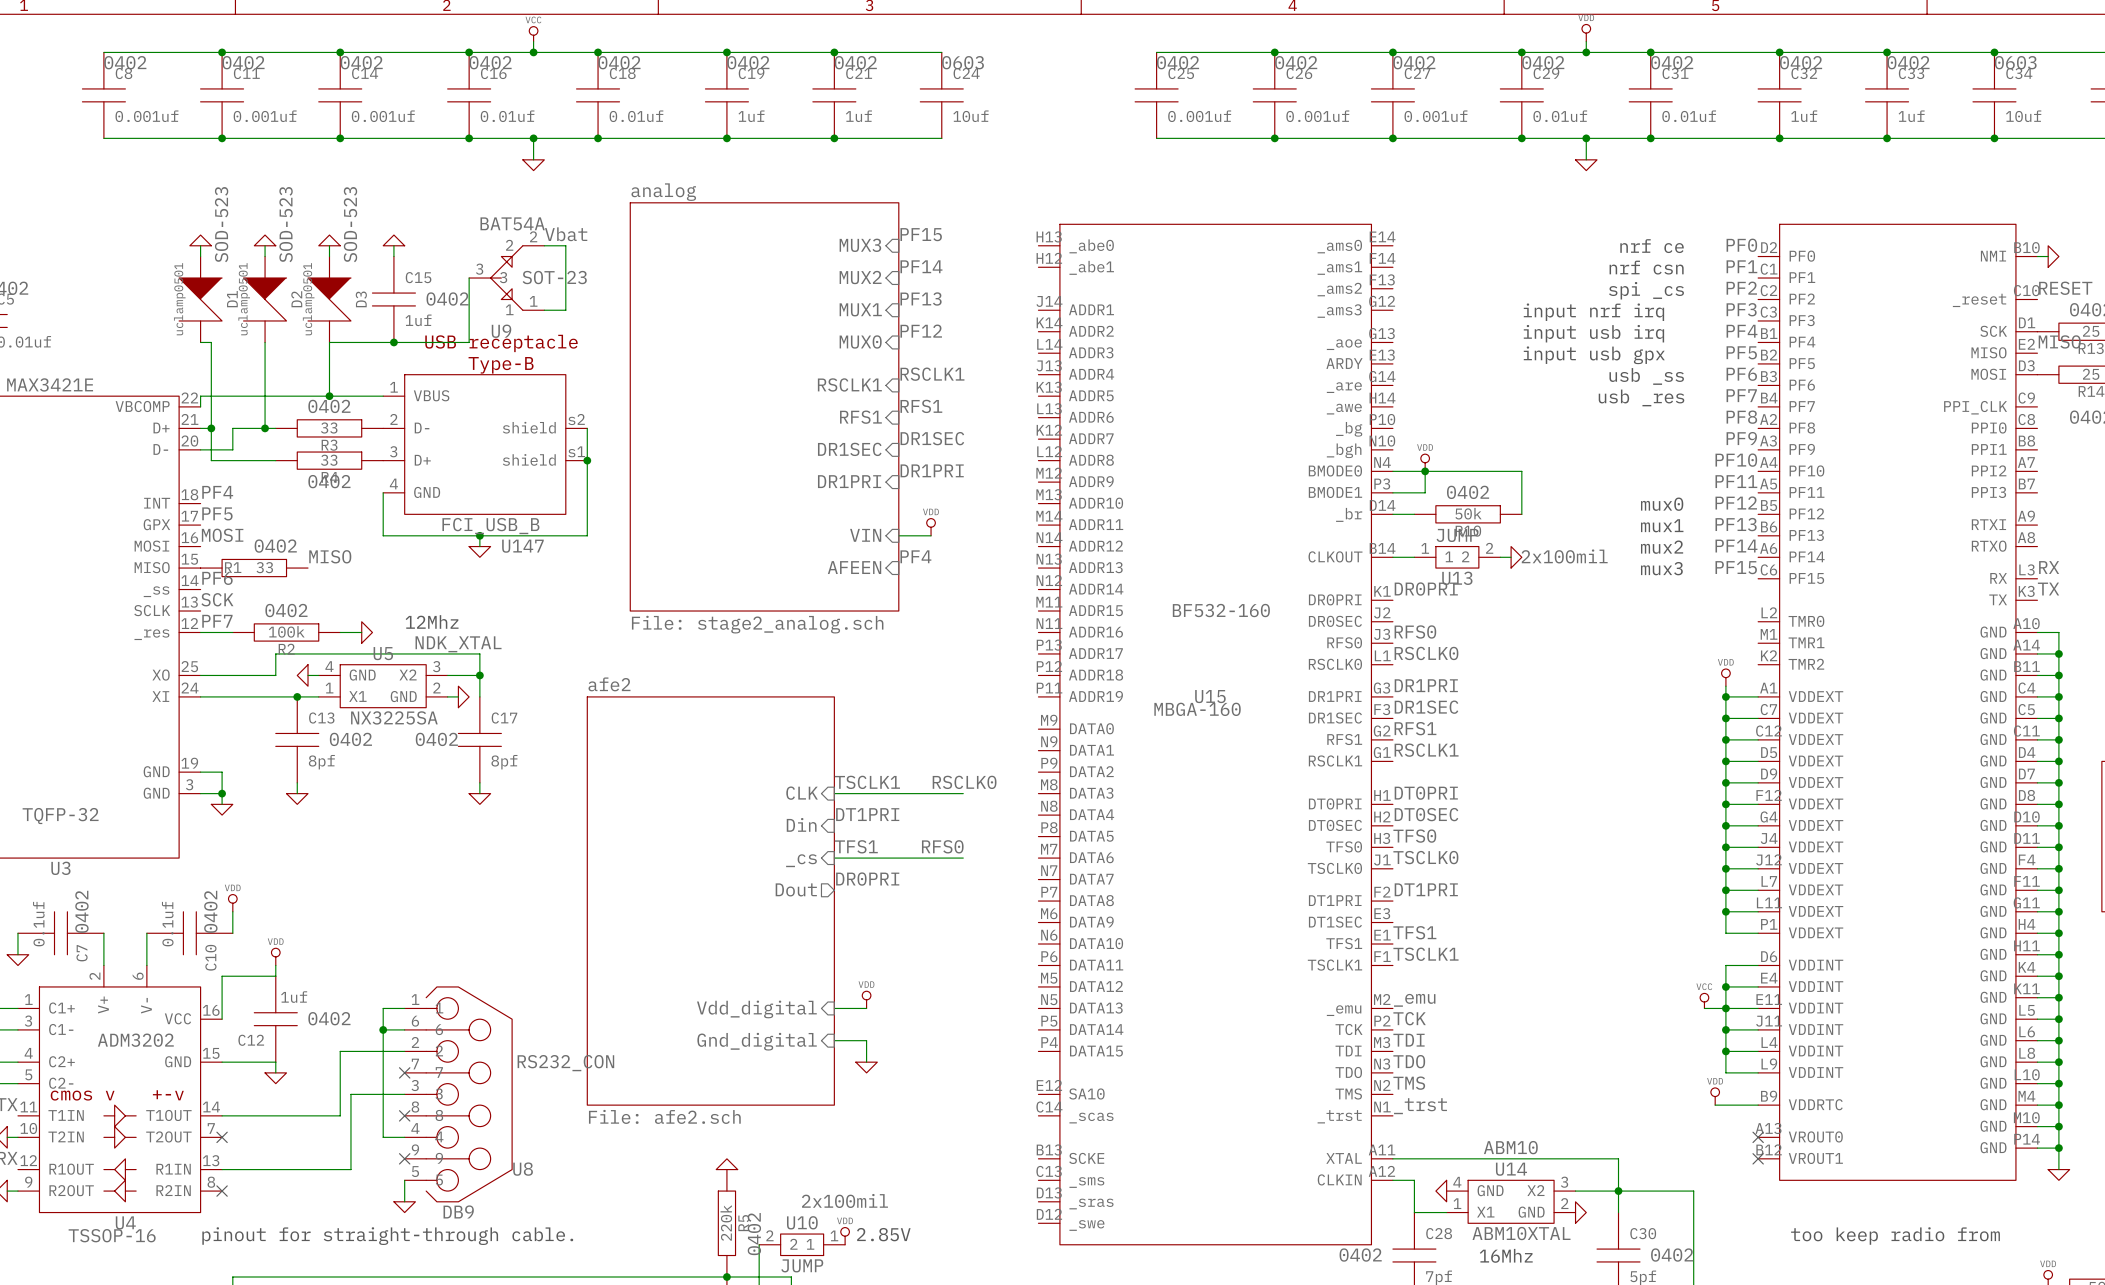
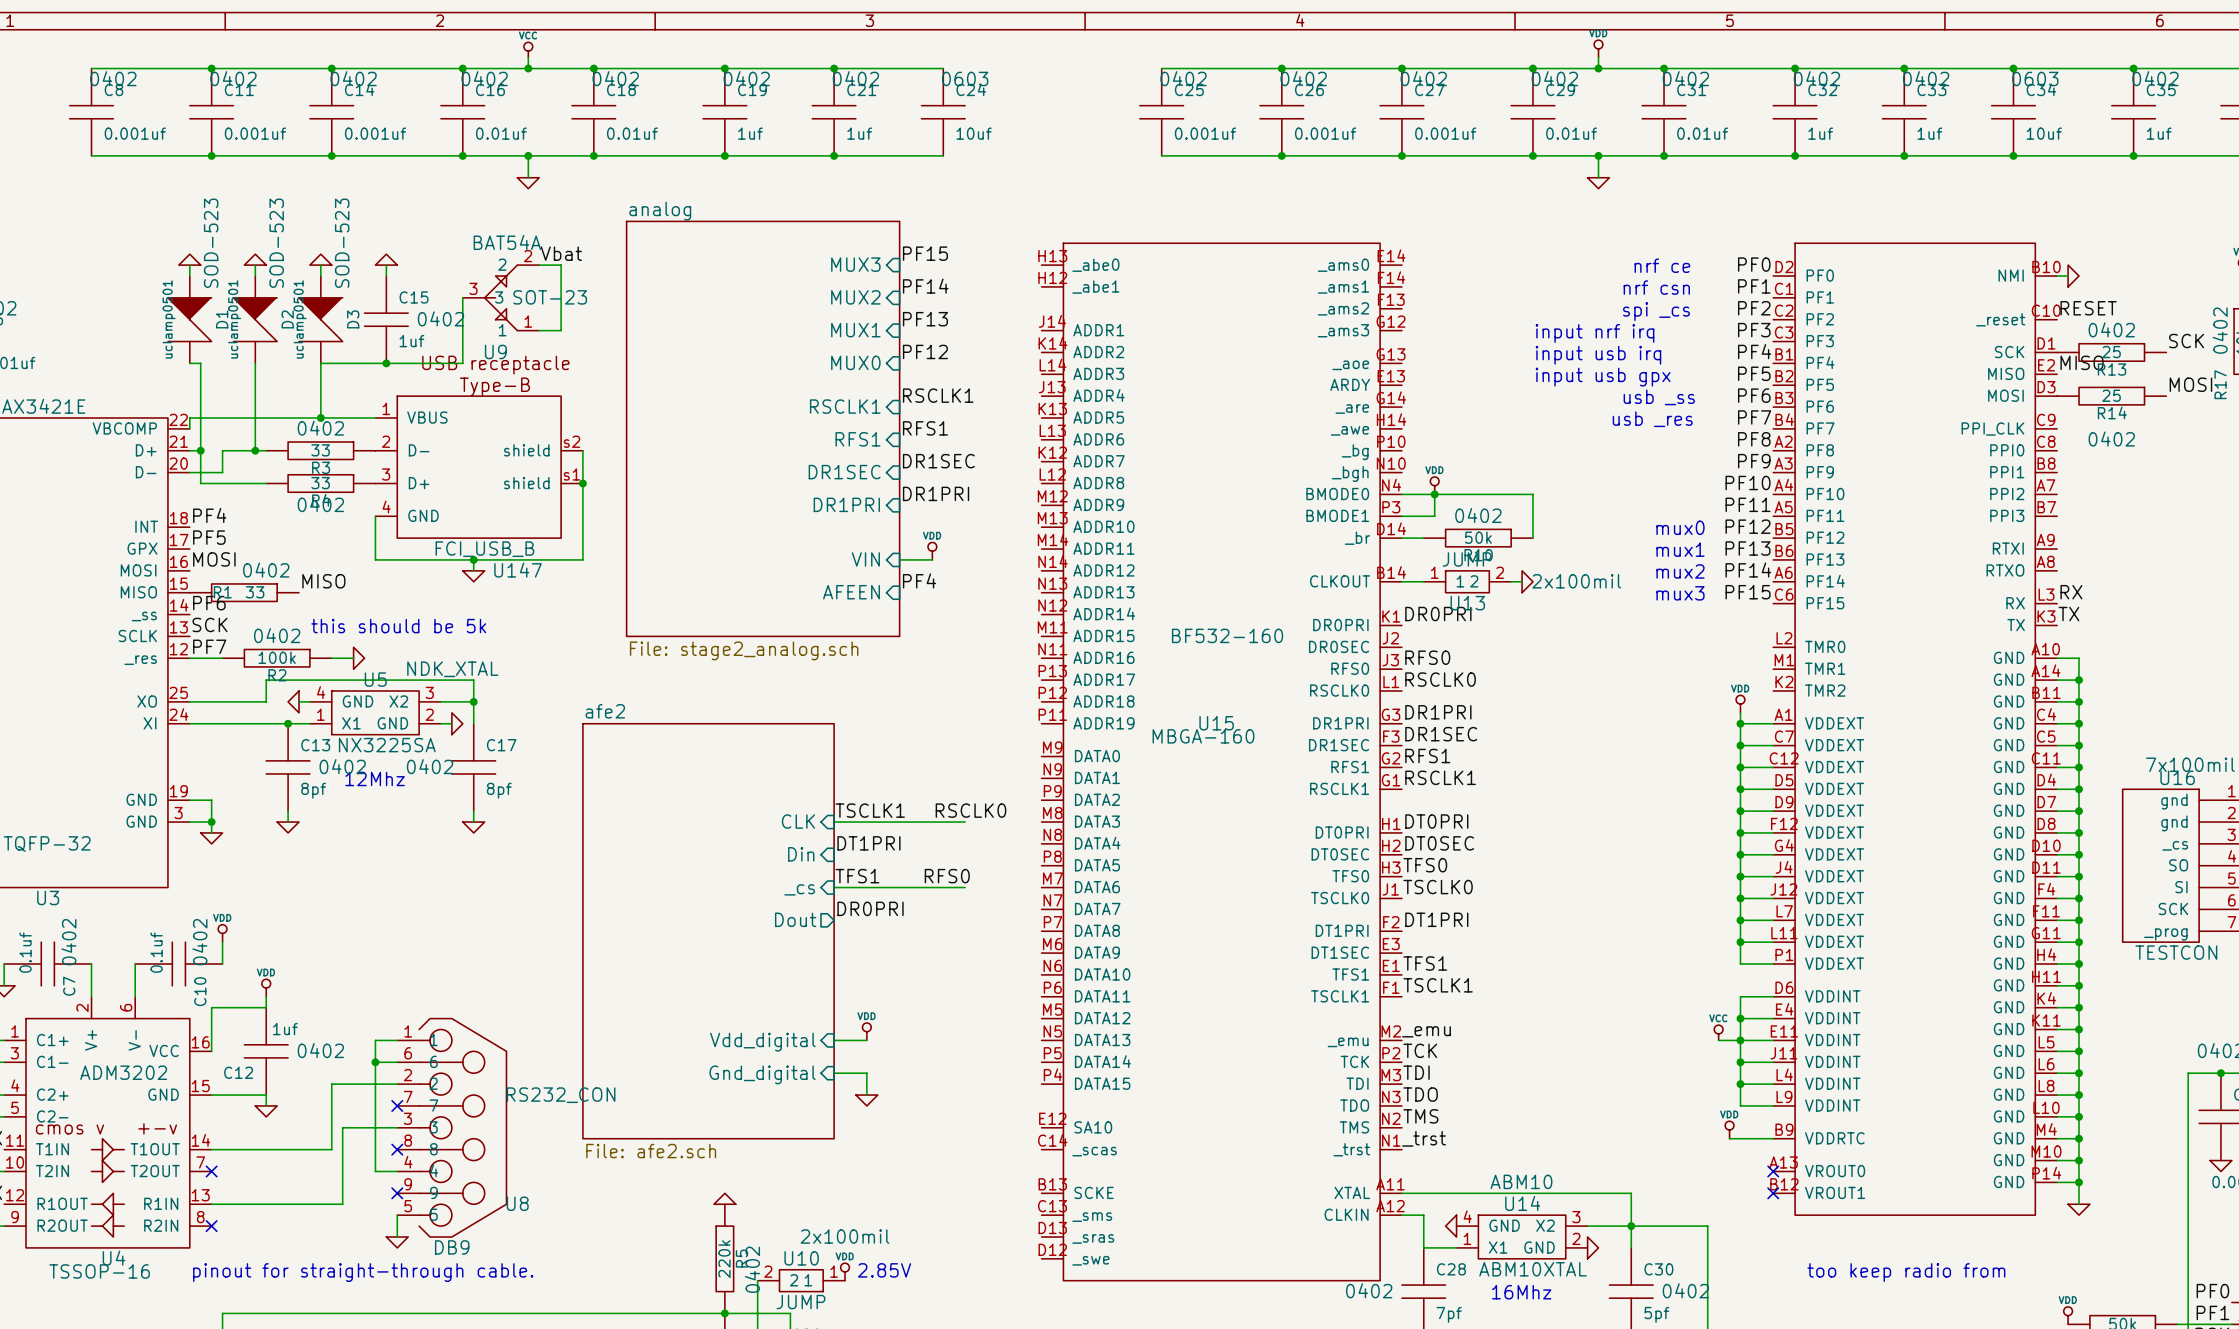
text: none -> this should be 5k (398, 626)
text position: 12Mhz (432, 621) -> 12Mhz (375, 778)

